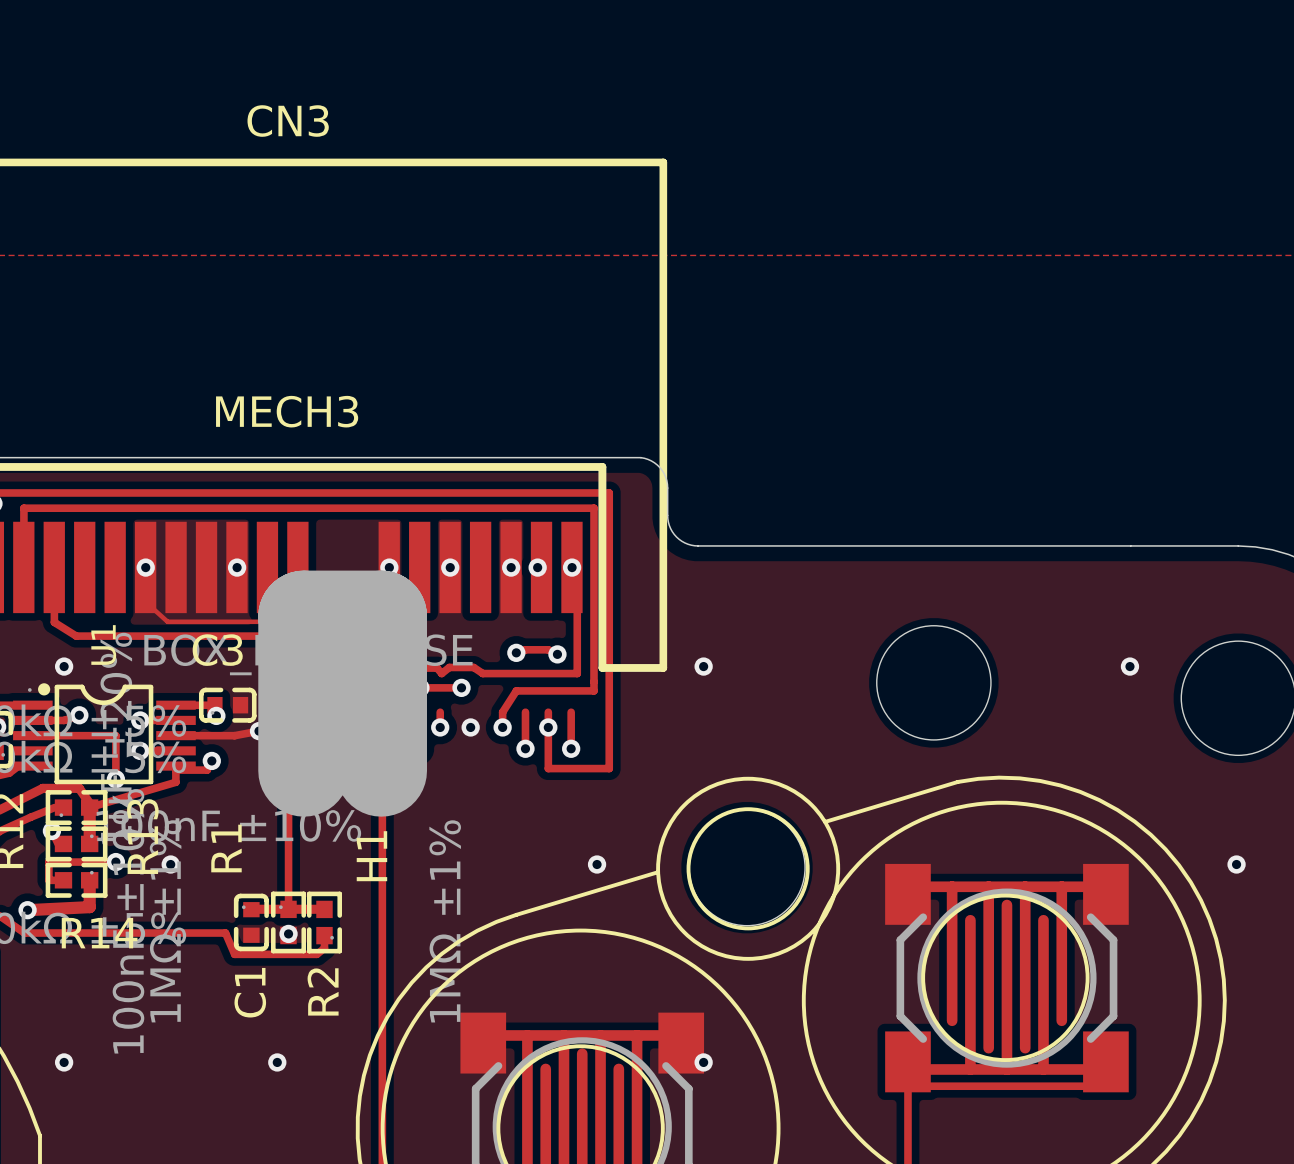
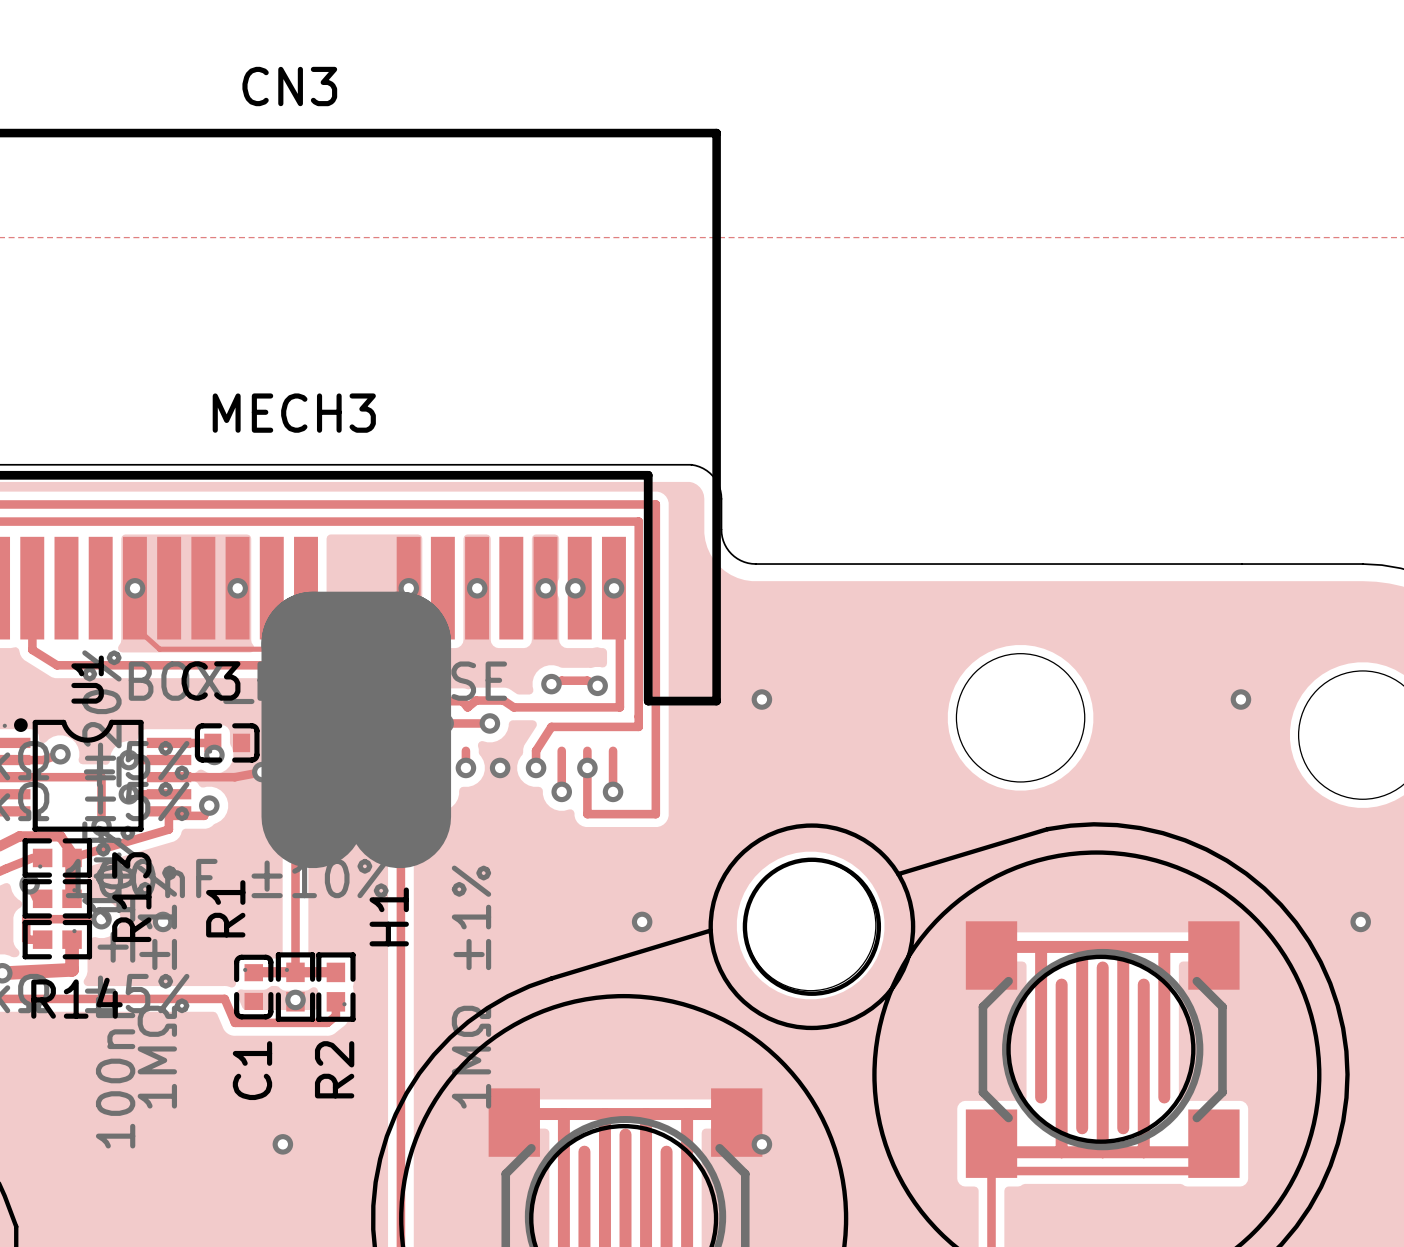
via: (64, 666) -> none
via: (64, 1062) -> none

